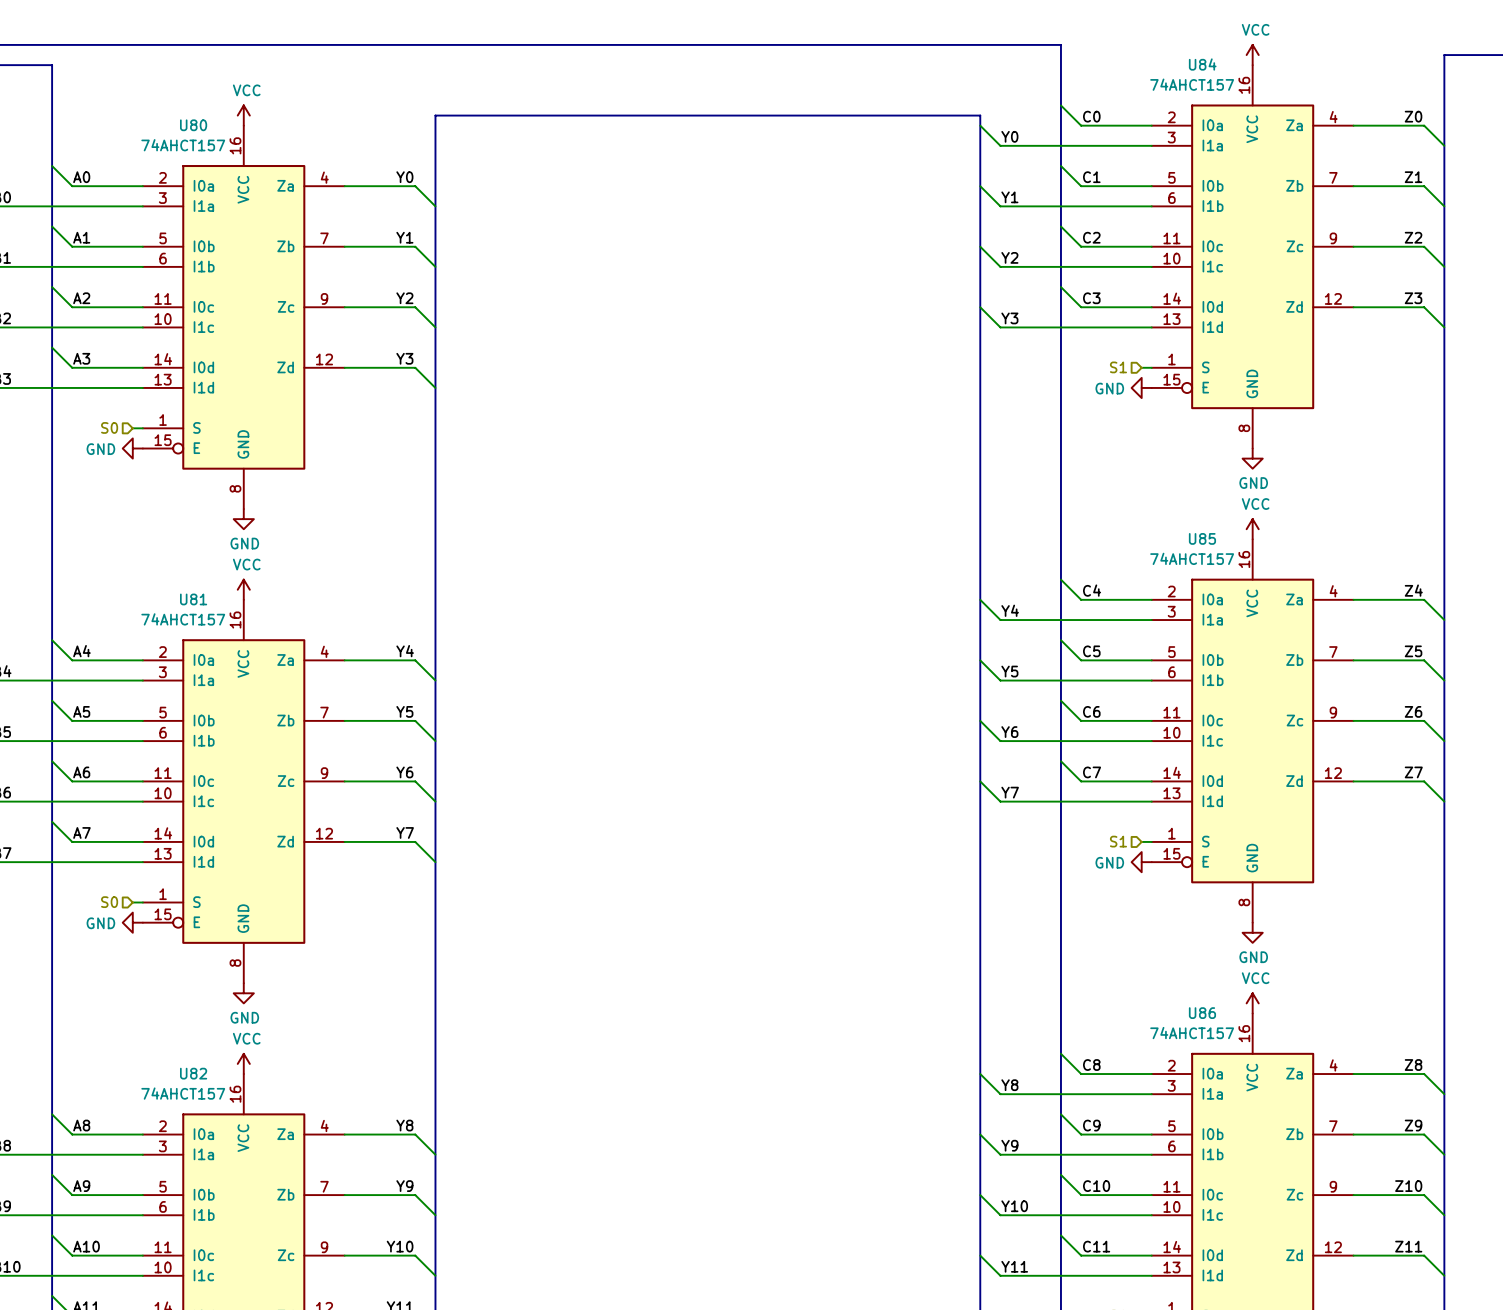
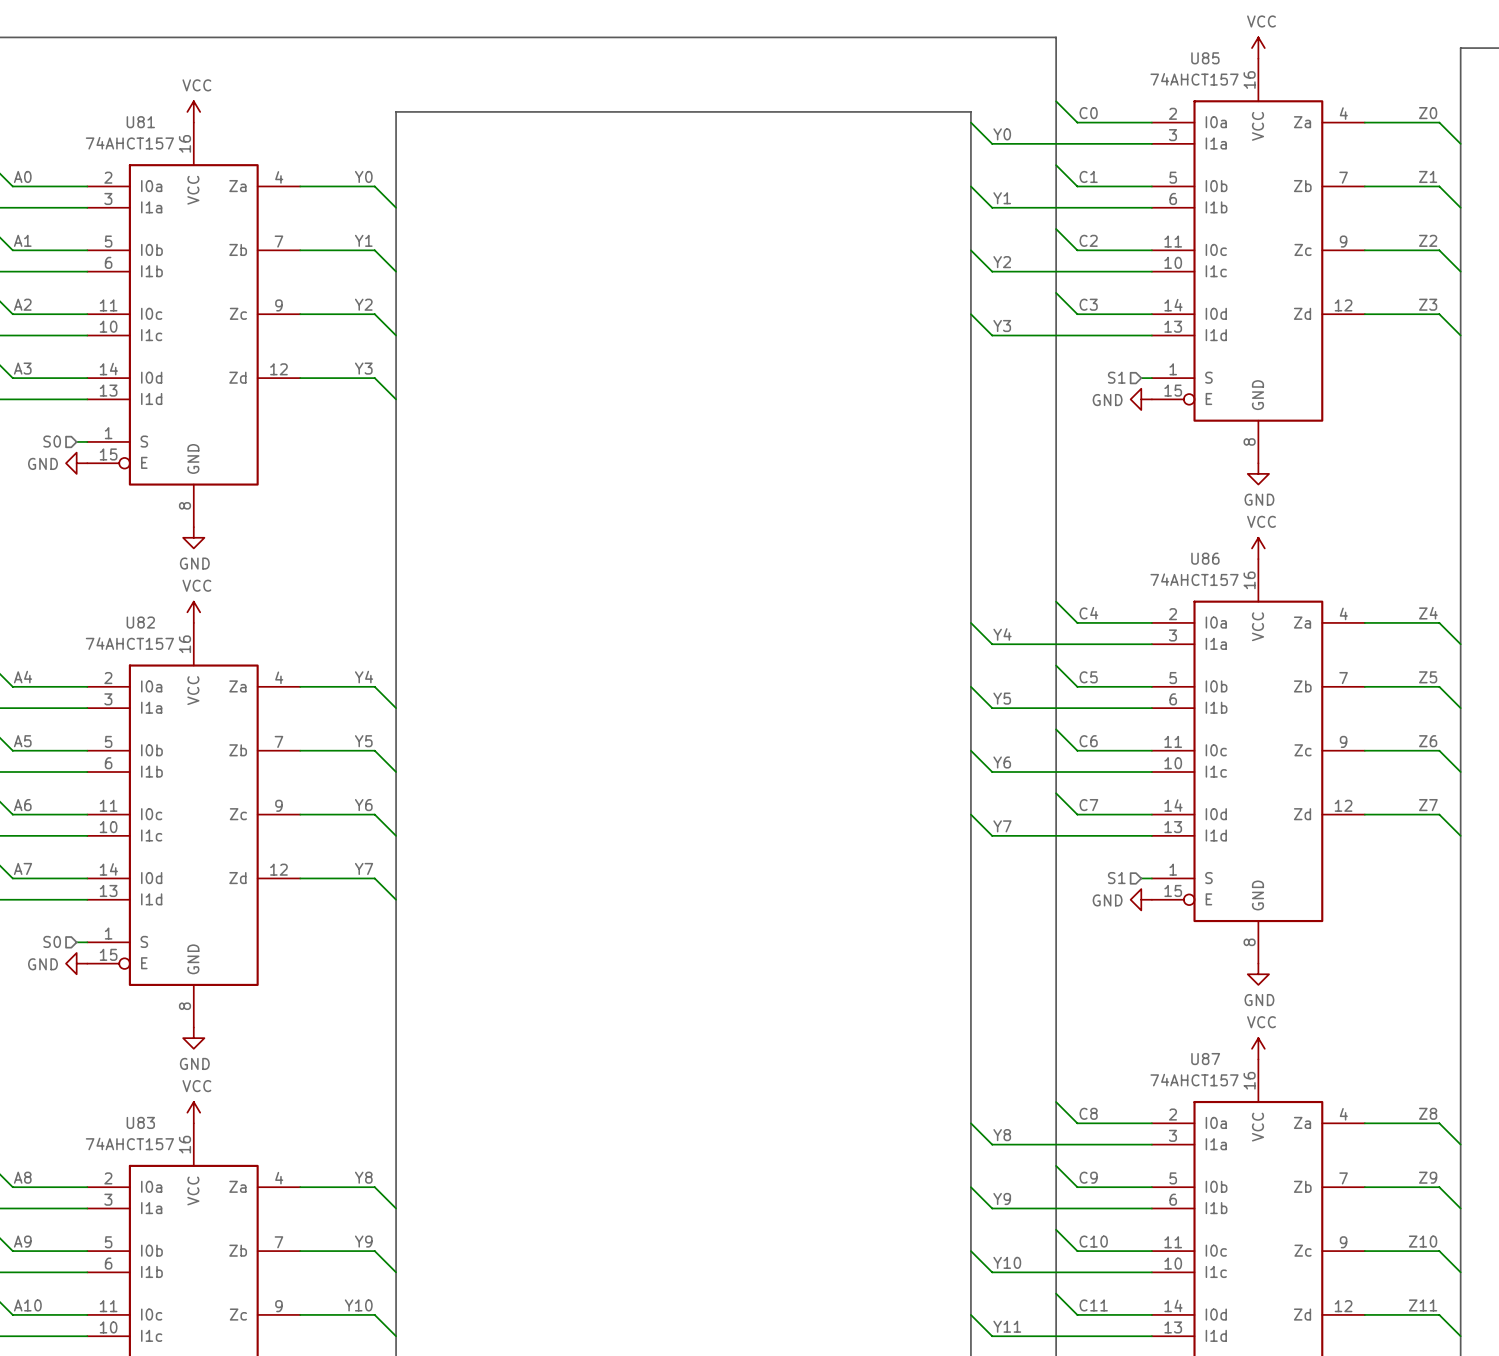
U84 name: U84 (1202, 64) -> U85 (1205, 58)
U80 name: U80 (193, 125) -> U81 (140, 122)
U85 name: U85 (1202, 538) -> U86 (1205, 558)
U81 name: U81 (193, 599) -> U82 (140, 622)
U86 name: U86 (1202, 1013) -> U87 (1205, 1059)
U82 name: U82 (193, 1073) -> U83 (140, 1122)

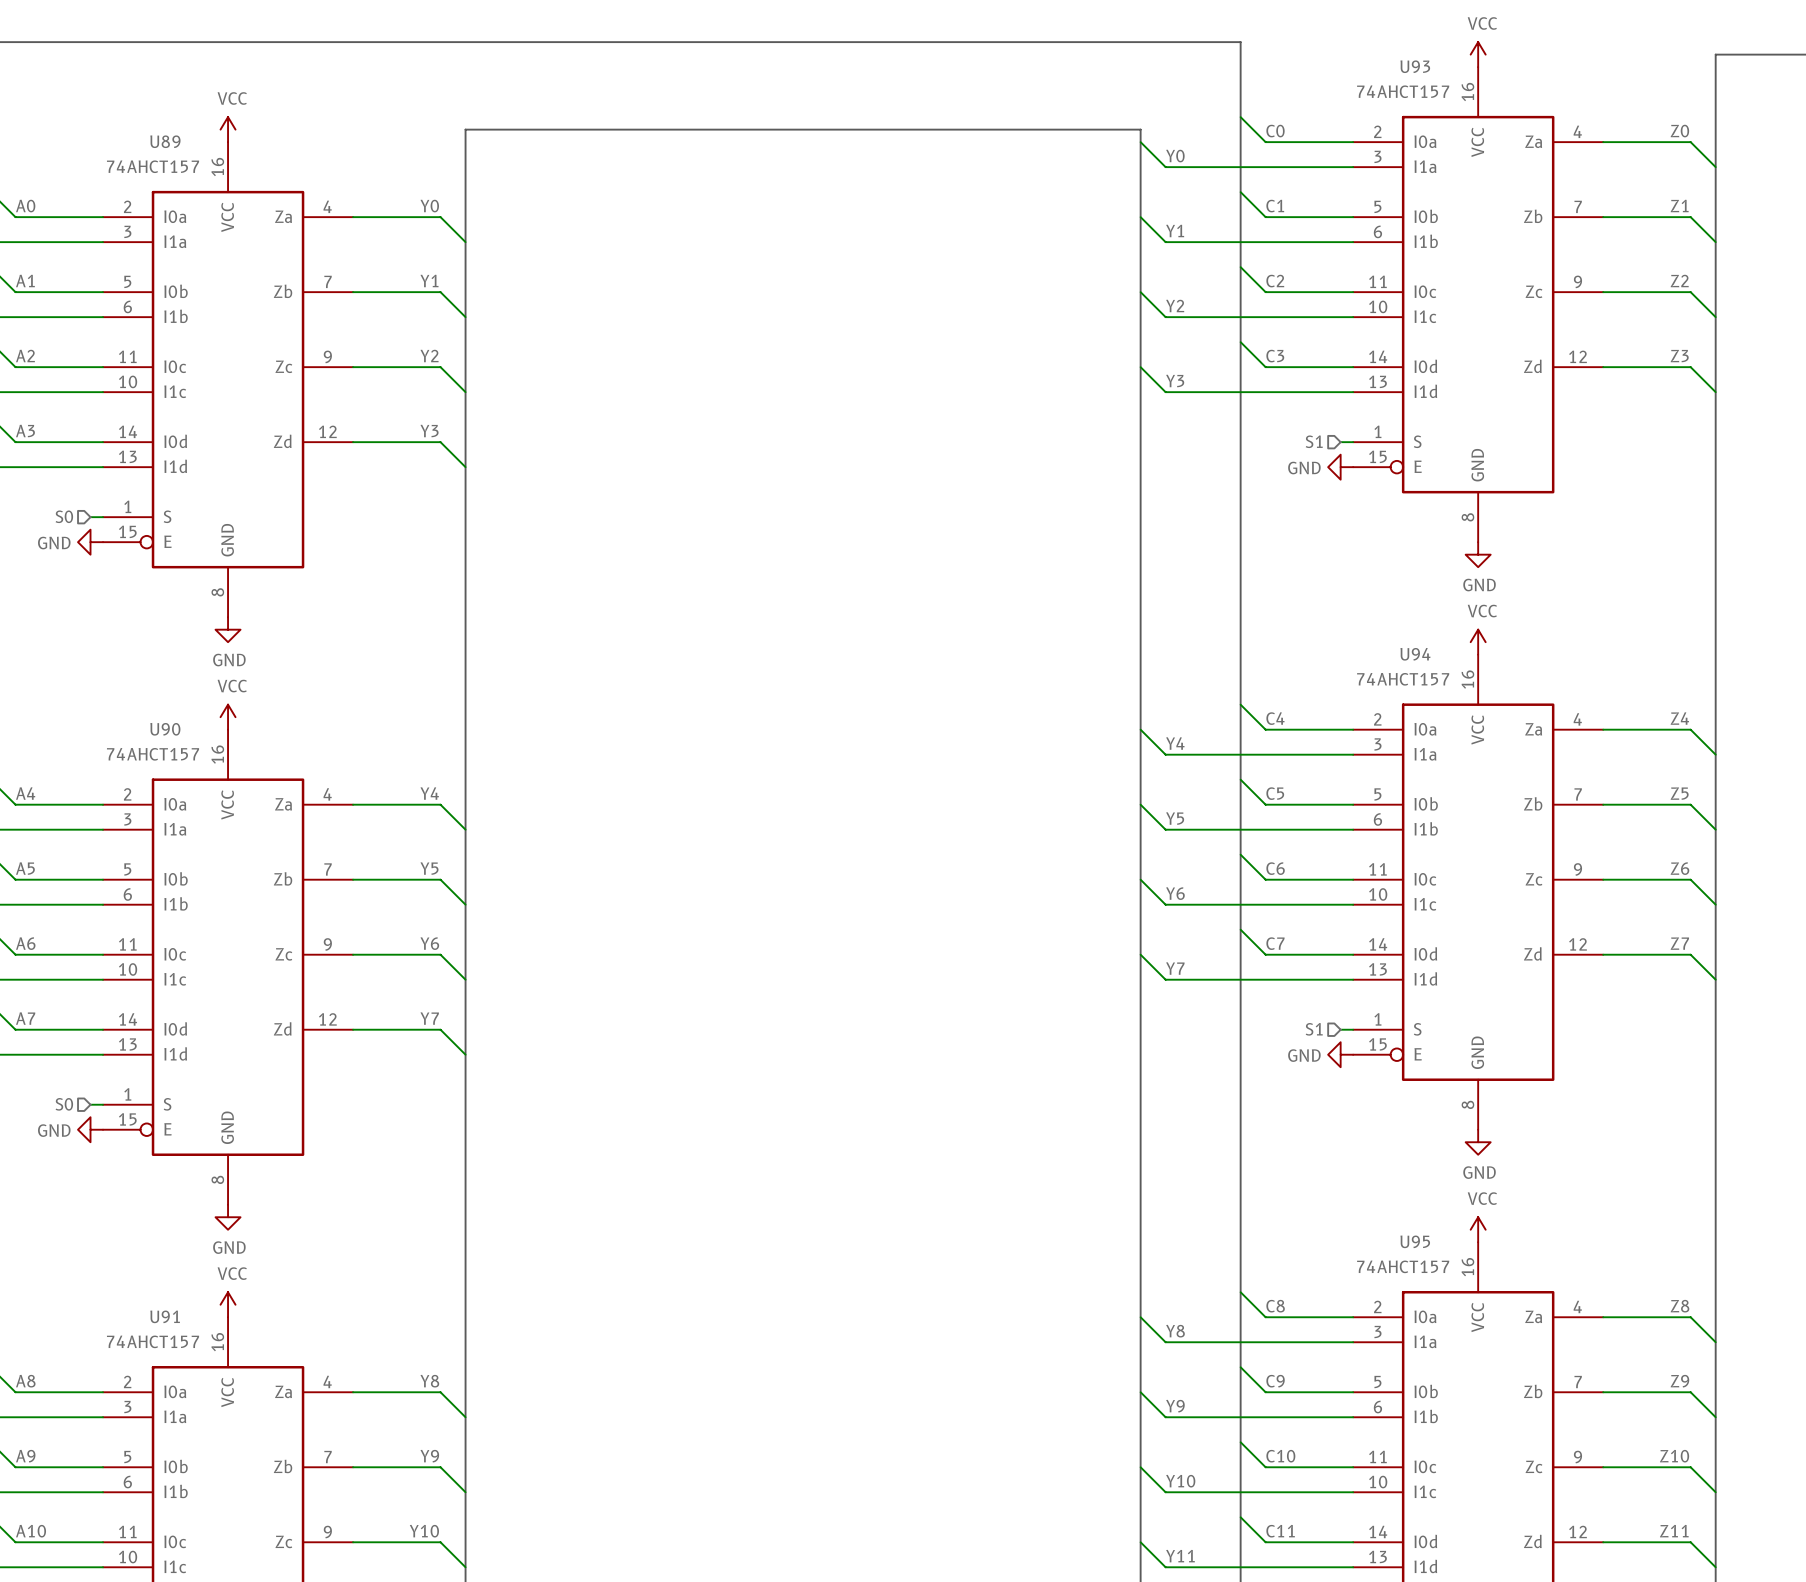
U85 name: U85 (1205, 58) -> U93 (1415, 66)
U81 name: U81 (140, 122) -> U89 (165, 141)
U86 name: U86 (1205, 558) -> U94 (1415, 654)
U82 name: U82 (140, 622) -> U90 (165, 729)
U87 name: U87 (1205, 1059) -> U95 (1415, 1241)
U83 name: U83 (140, 1122) -> U91 (165, 1316)

